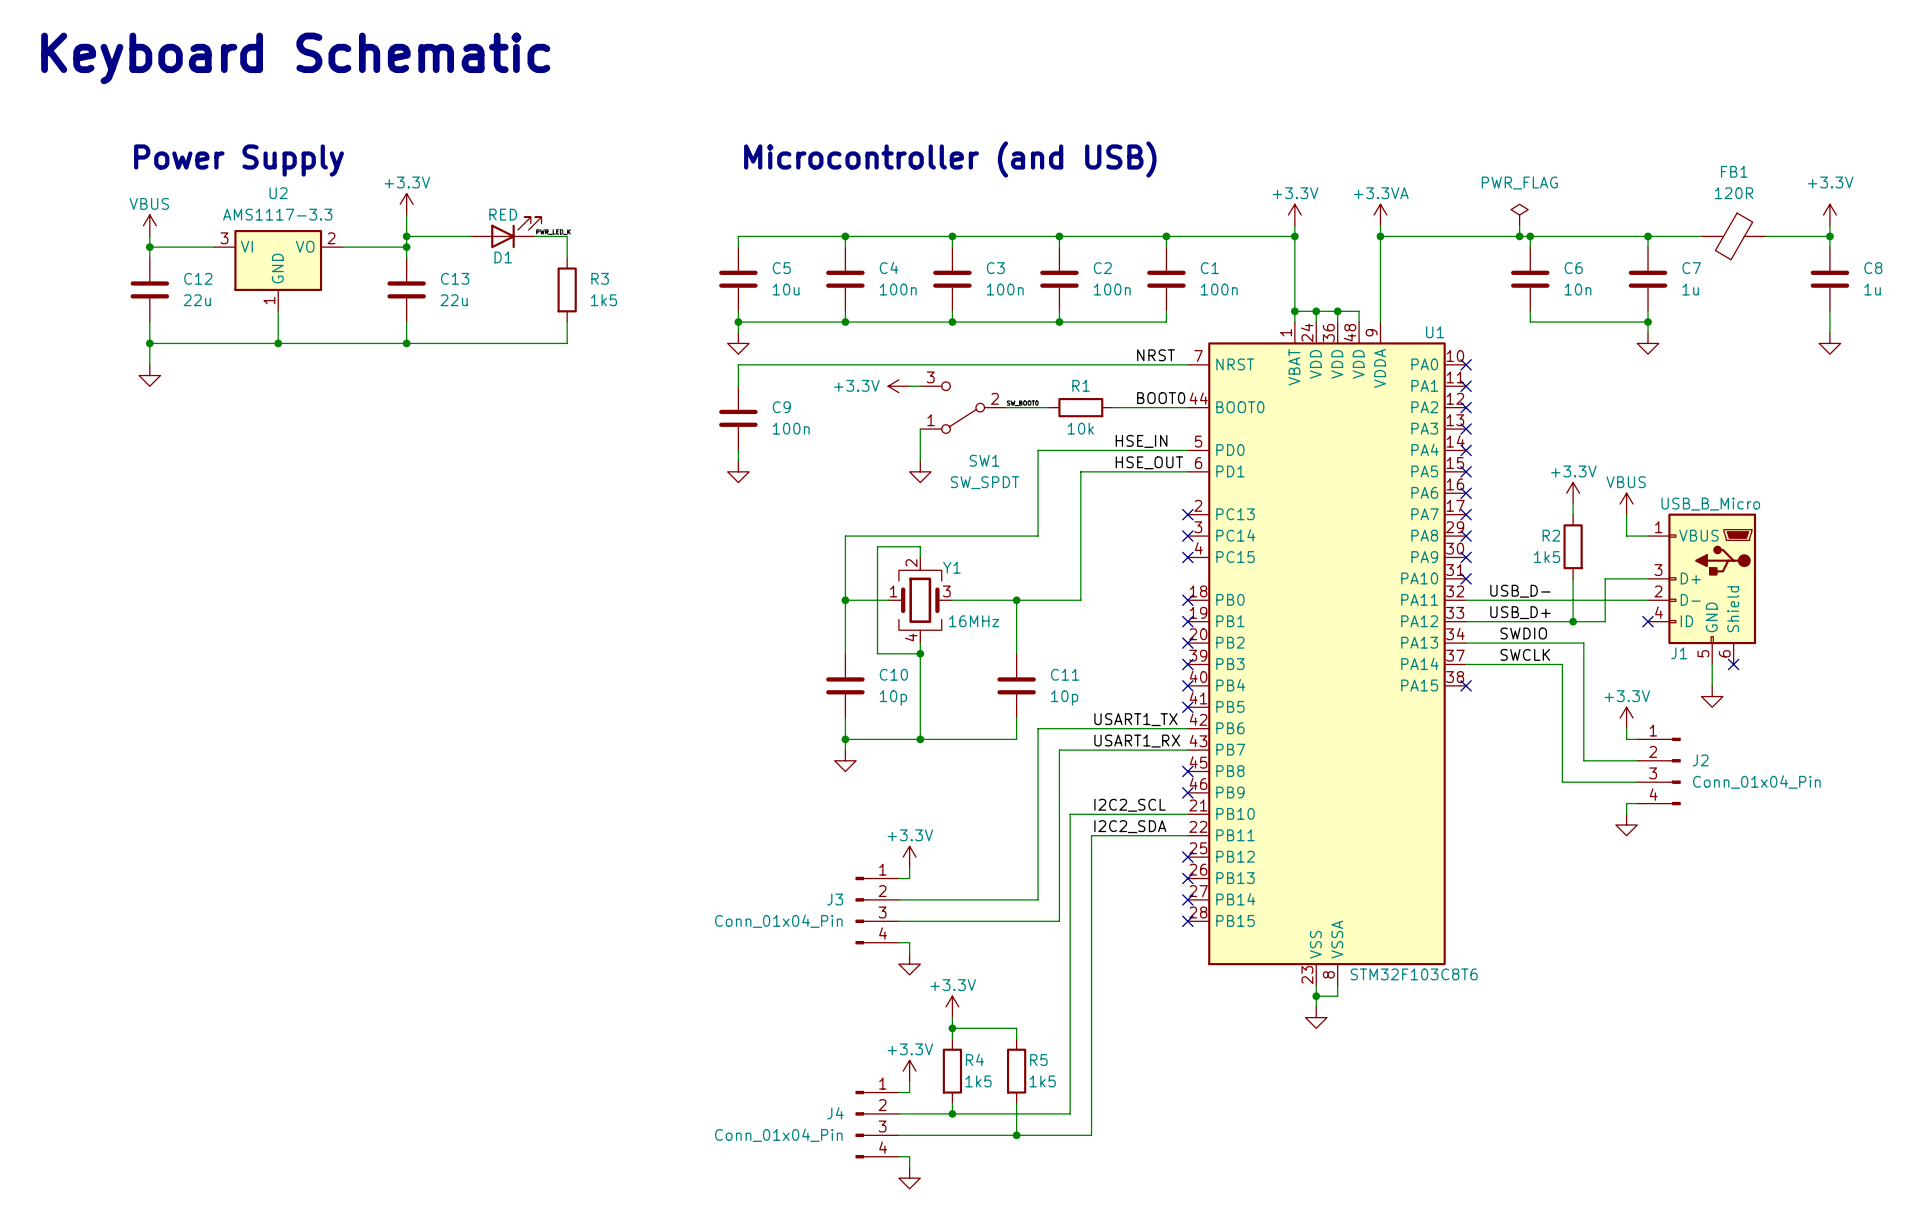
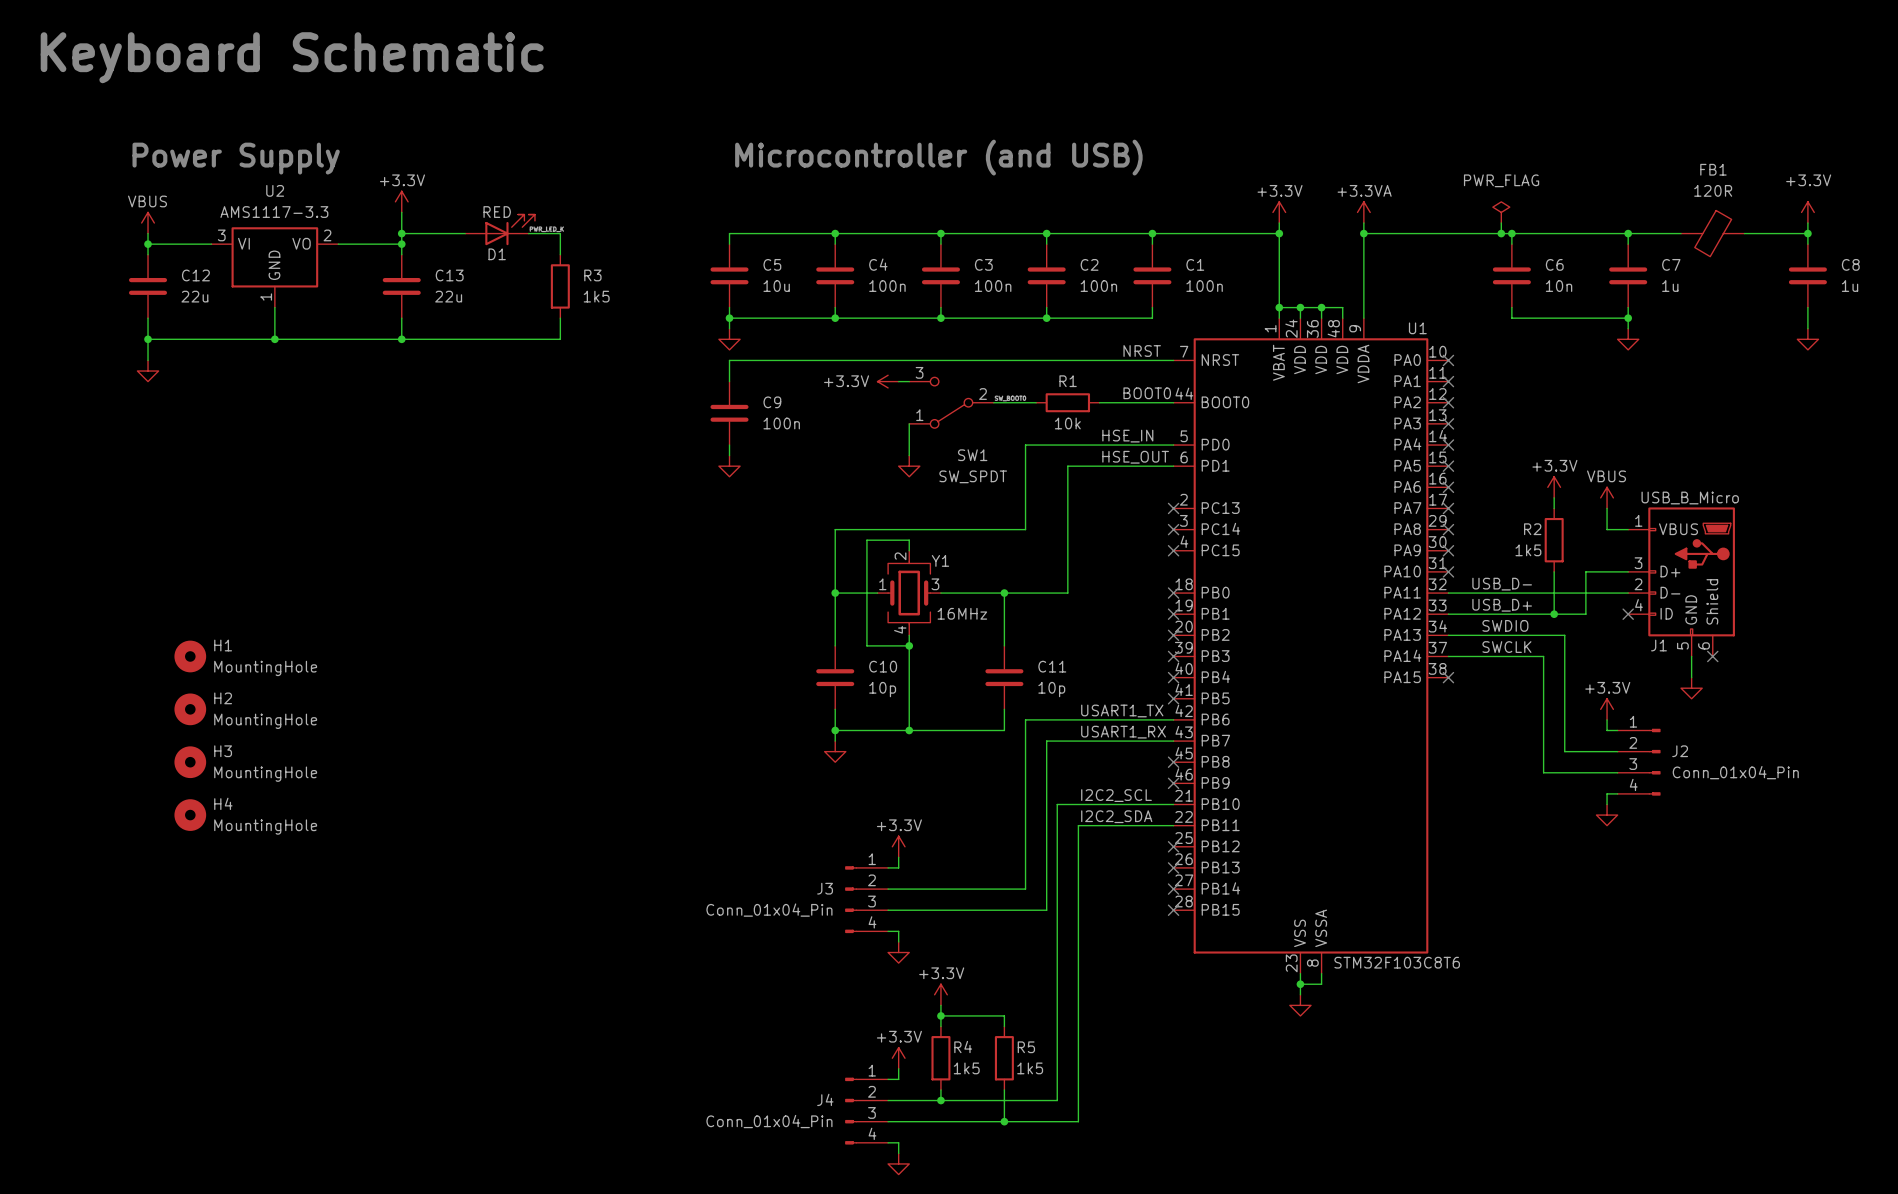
H1: none -> MountingHole (190, 656)
H2: none -> MountingHole (190, 709)
H3: none -> MountingHole (190, 762)
H4: none -> MountingHole (190, 815)

